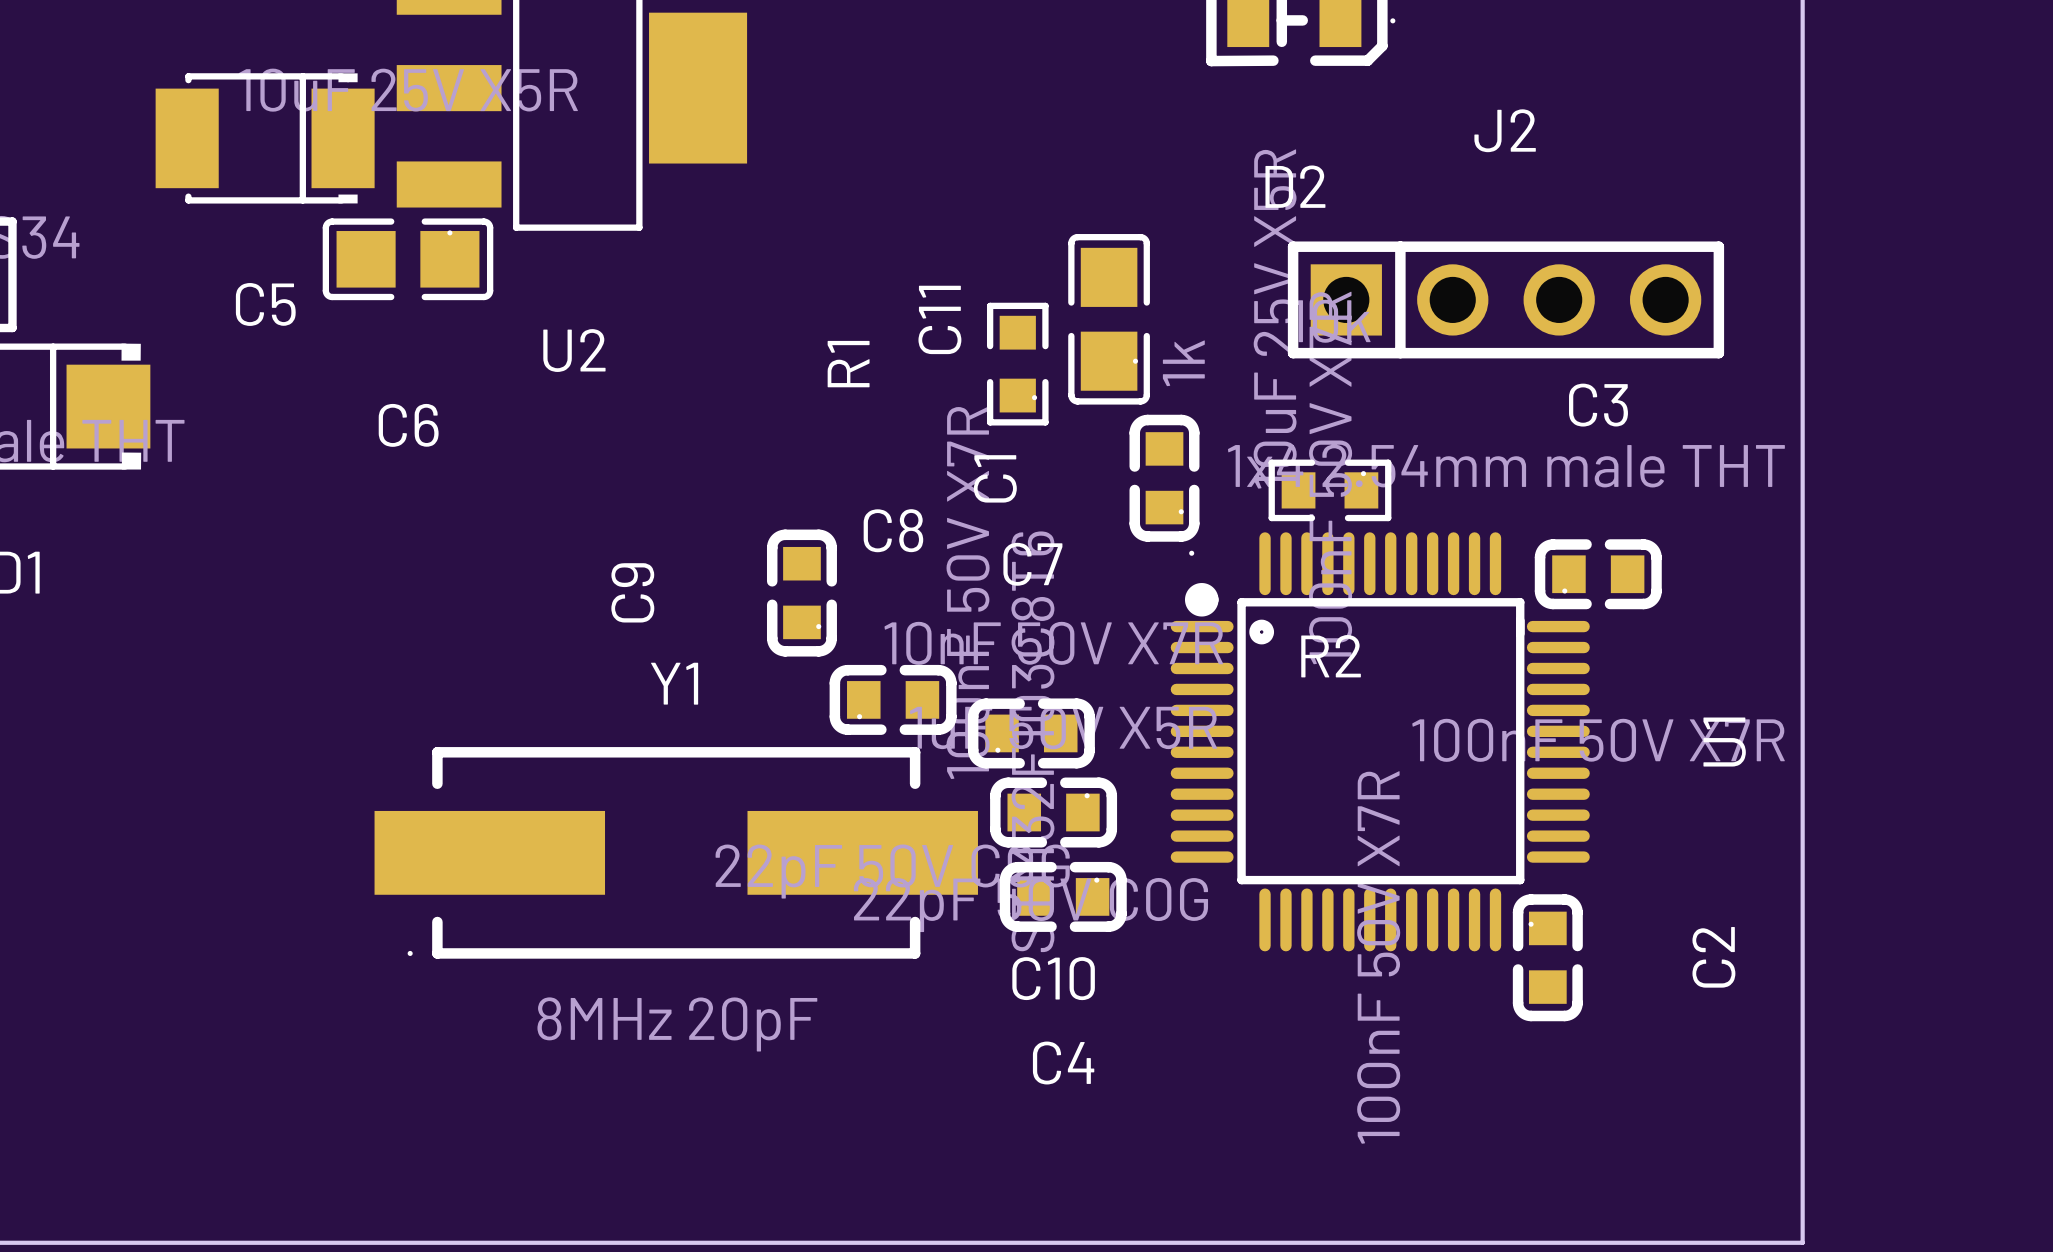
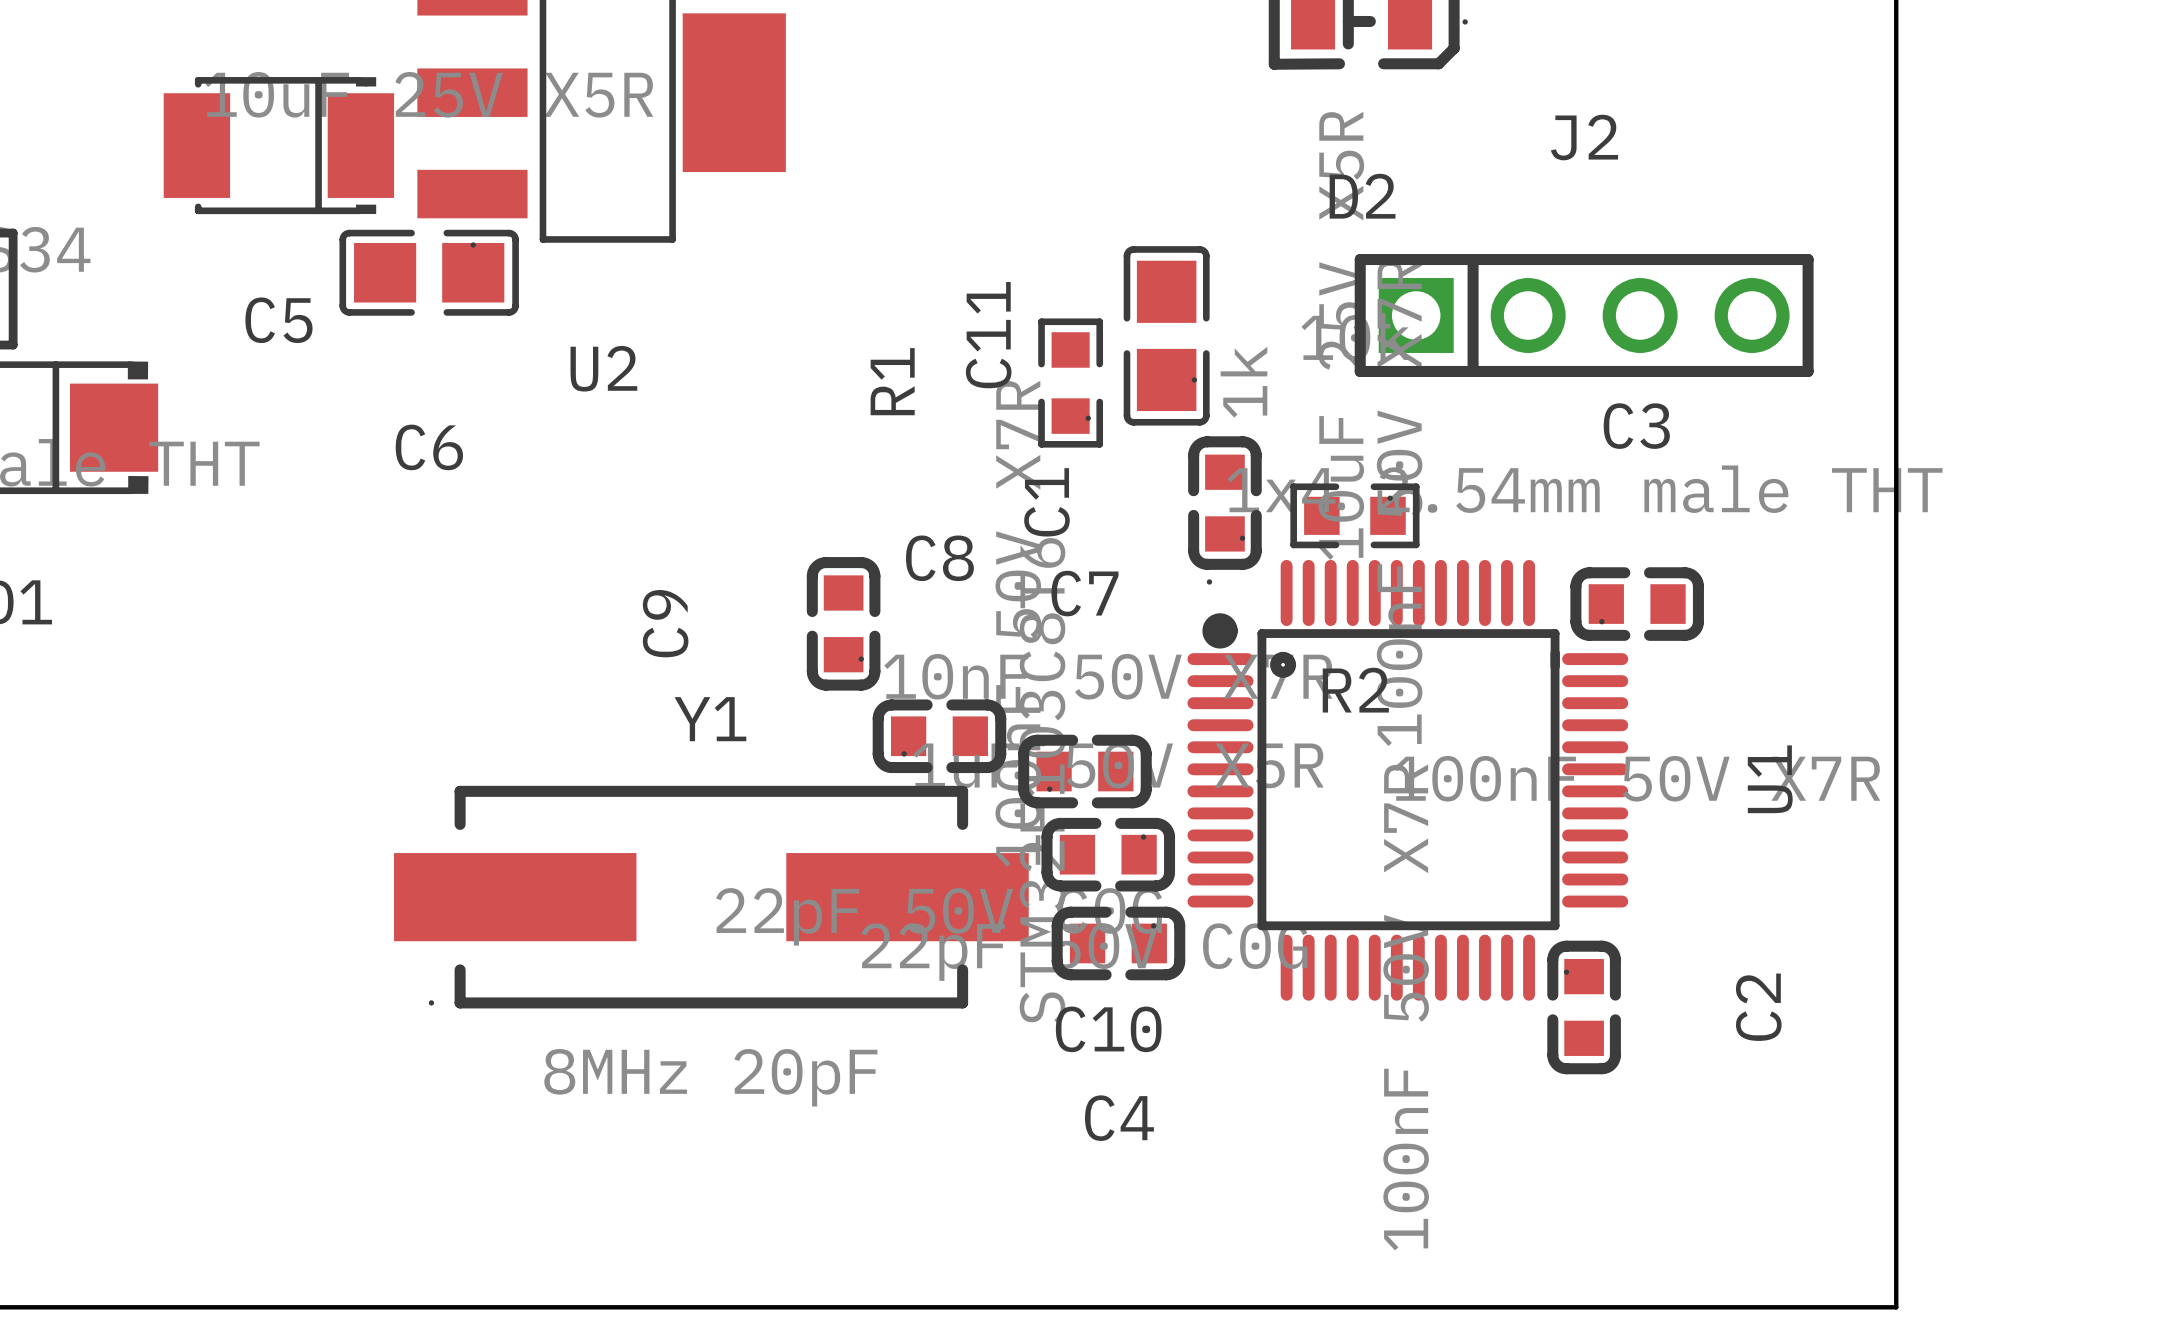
R2 position: (1329, 490) -> (1354, 515)
C3 position: (1598, 574) -> (1637, 604)
U1 position: (1380, 741) -> (1407, 780)
C2 position: (1547, 957) -> (1584, 1007)

